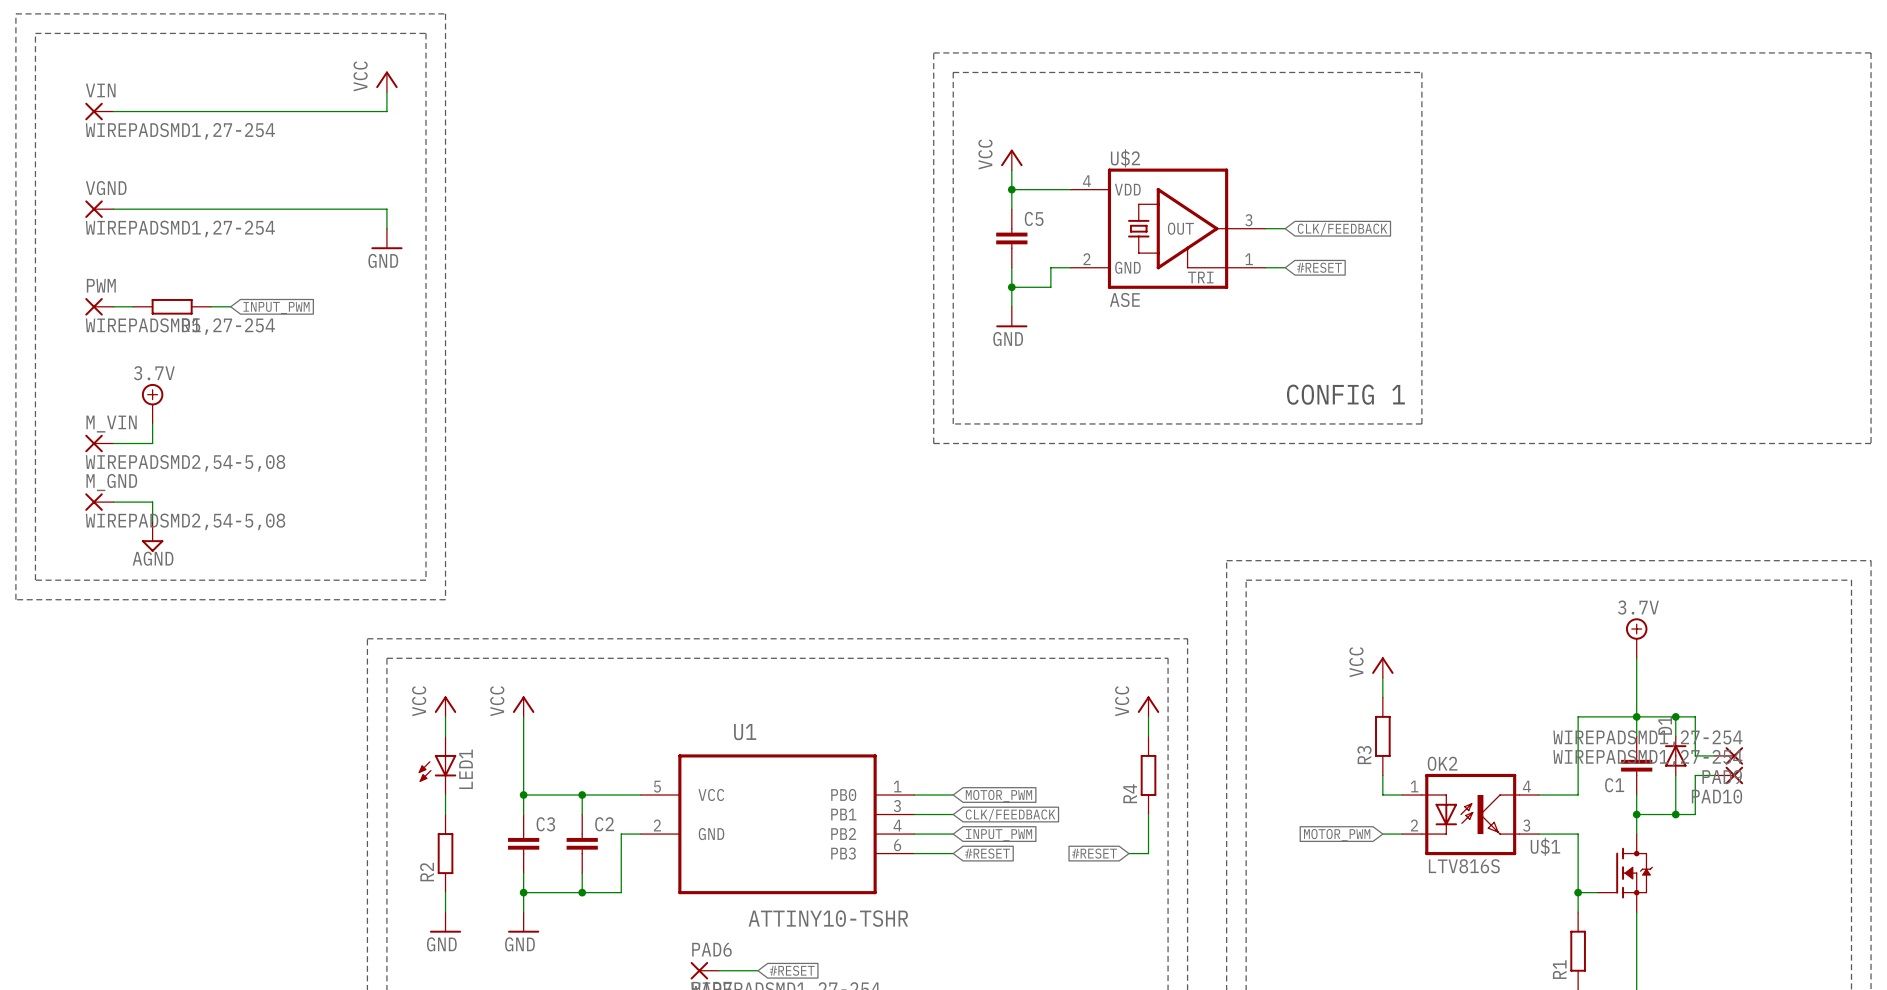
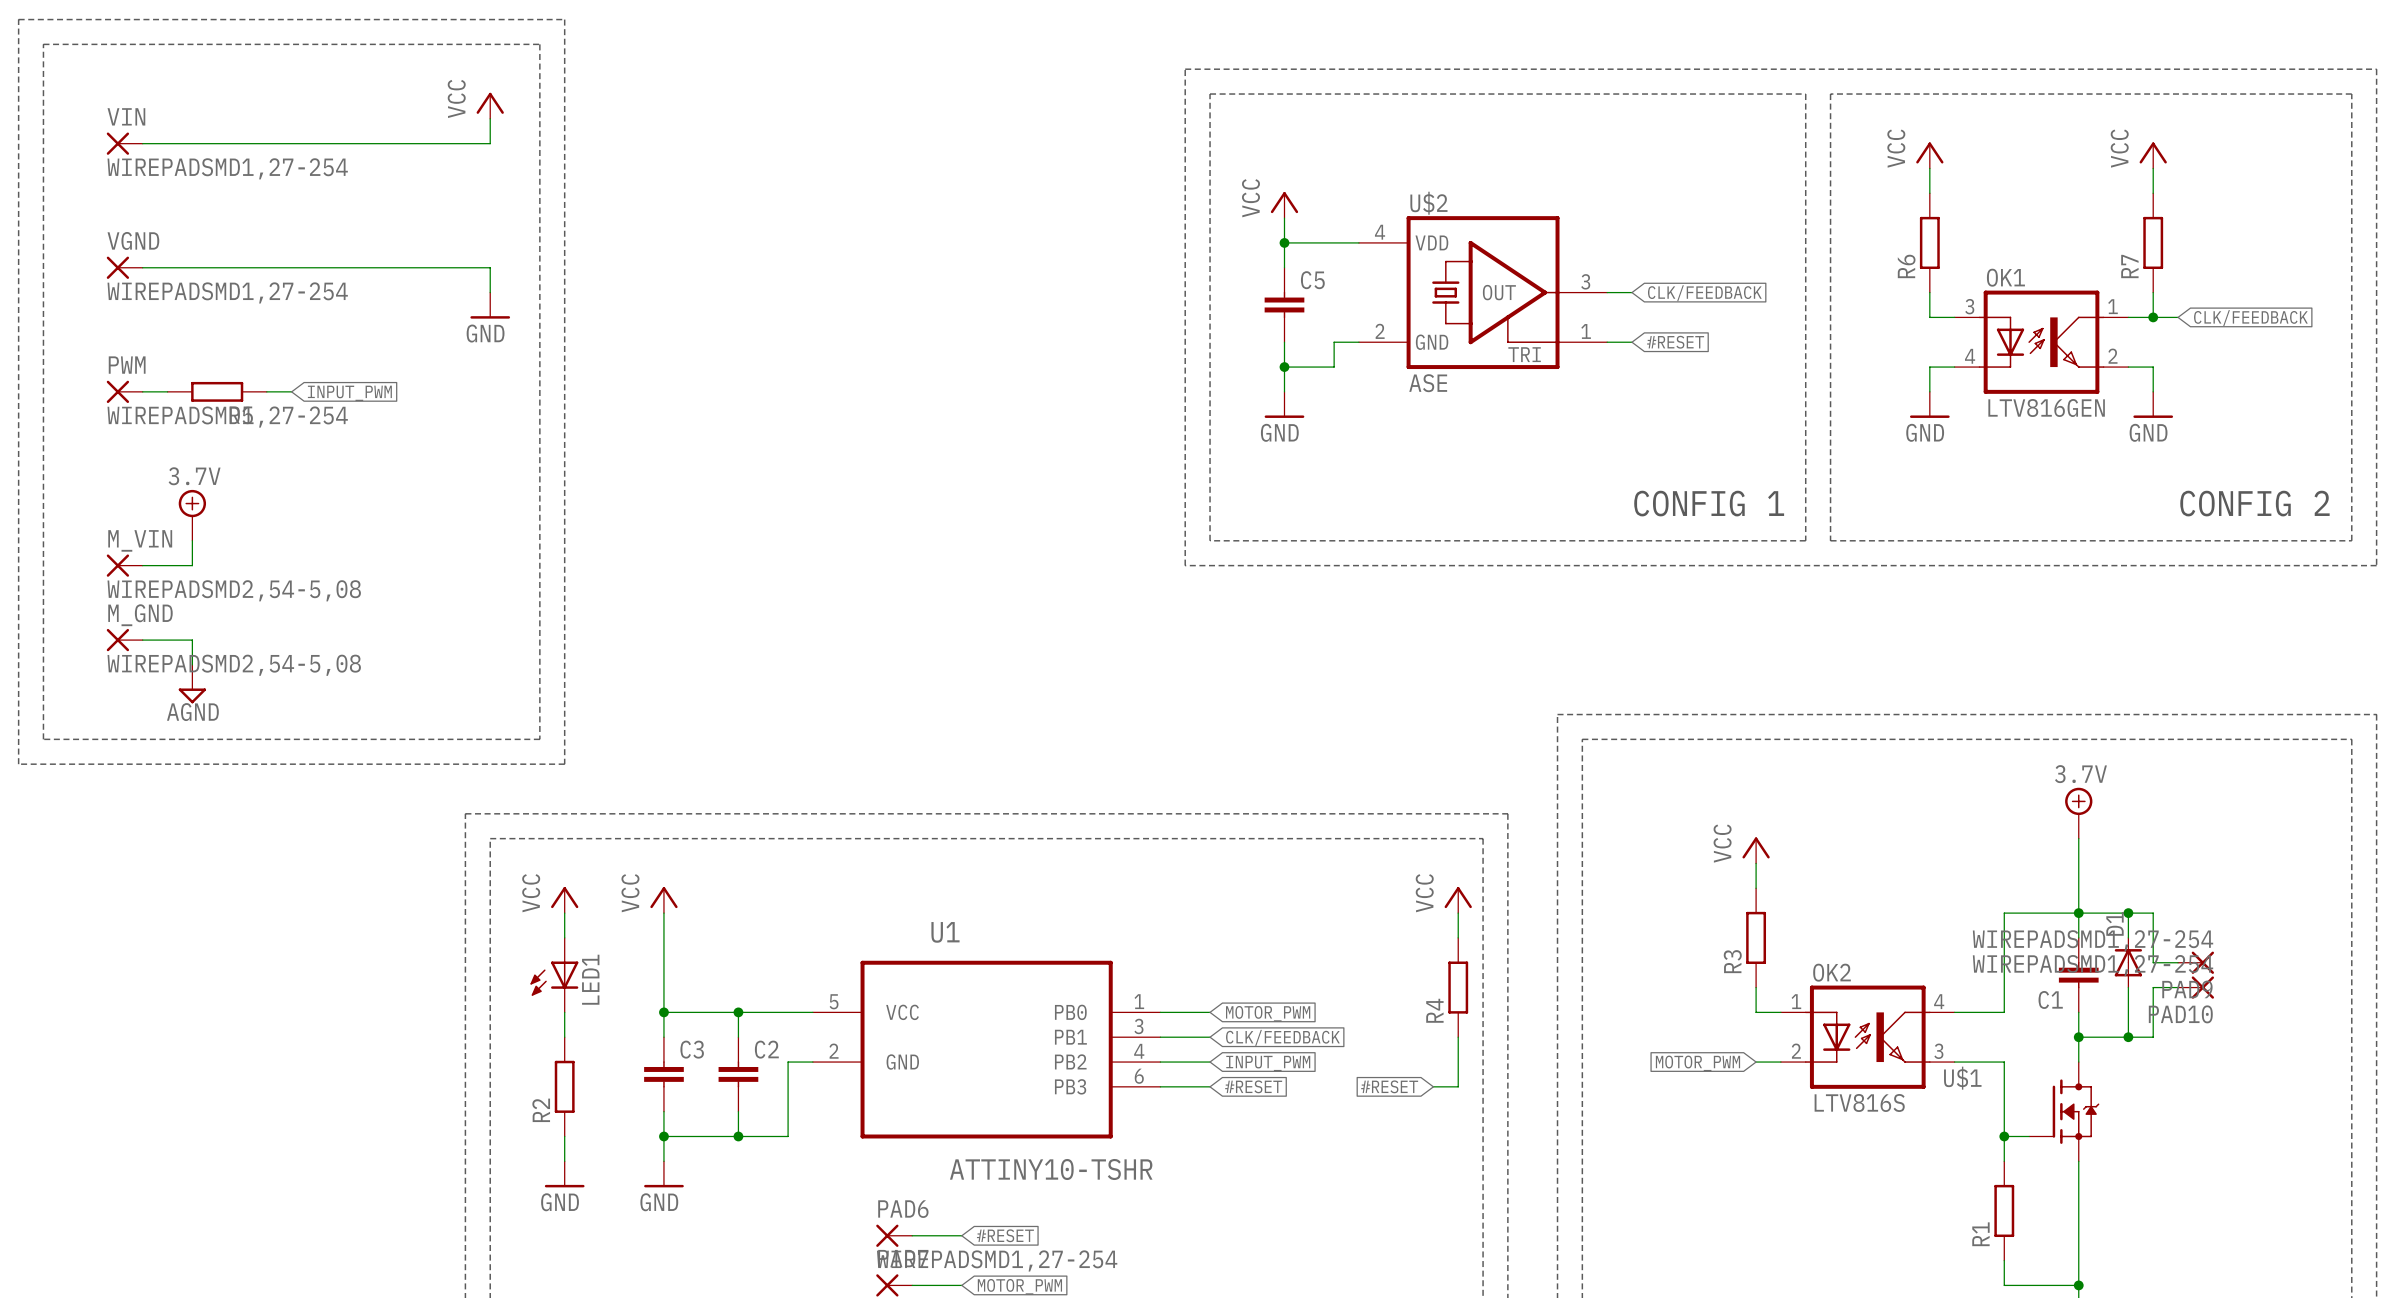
line: none -> (1830, 94) (1830, 540) (2351, 540) (2351, 94) (1830, 94)
power symbol: none -> VCC (1929, 155)
power symbol: none -> VCC (2153, 155)
wire: none -> (1929, 168) (1929, 193)
wire: none -> (2153, 168) (2153, 193)
R6: none -> (1929, 242)
R7: none -> (2153, 242)
wire: none -> (1929, 292) (1929, 317) (1954, 317)
wire: none -> (2153, 292) (2153, 317)
wire: none -> (2128, 317) (2178, 317)
junction: none -> (2153, 317)
global label: none -> CLK/FEEDBACK (2250, 318)
OK1: none -> LTV816GEN (2041, 342)
wire: none -> (1954, 367) (1929, 367) (1929, 391)
wire: none -> (2128, 367) (2153, 367) (2153, 391)
power symbol: none -> GND (1929, 404)
power symbol: none -> GND (2153, 404)
text: none -> CONFIG 2 (2254, 503)

